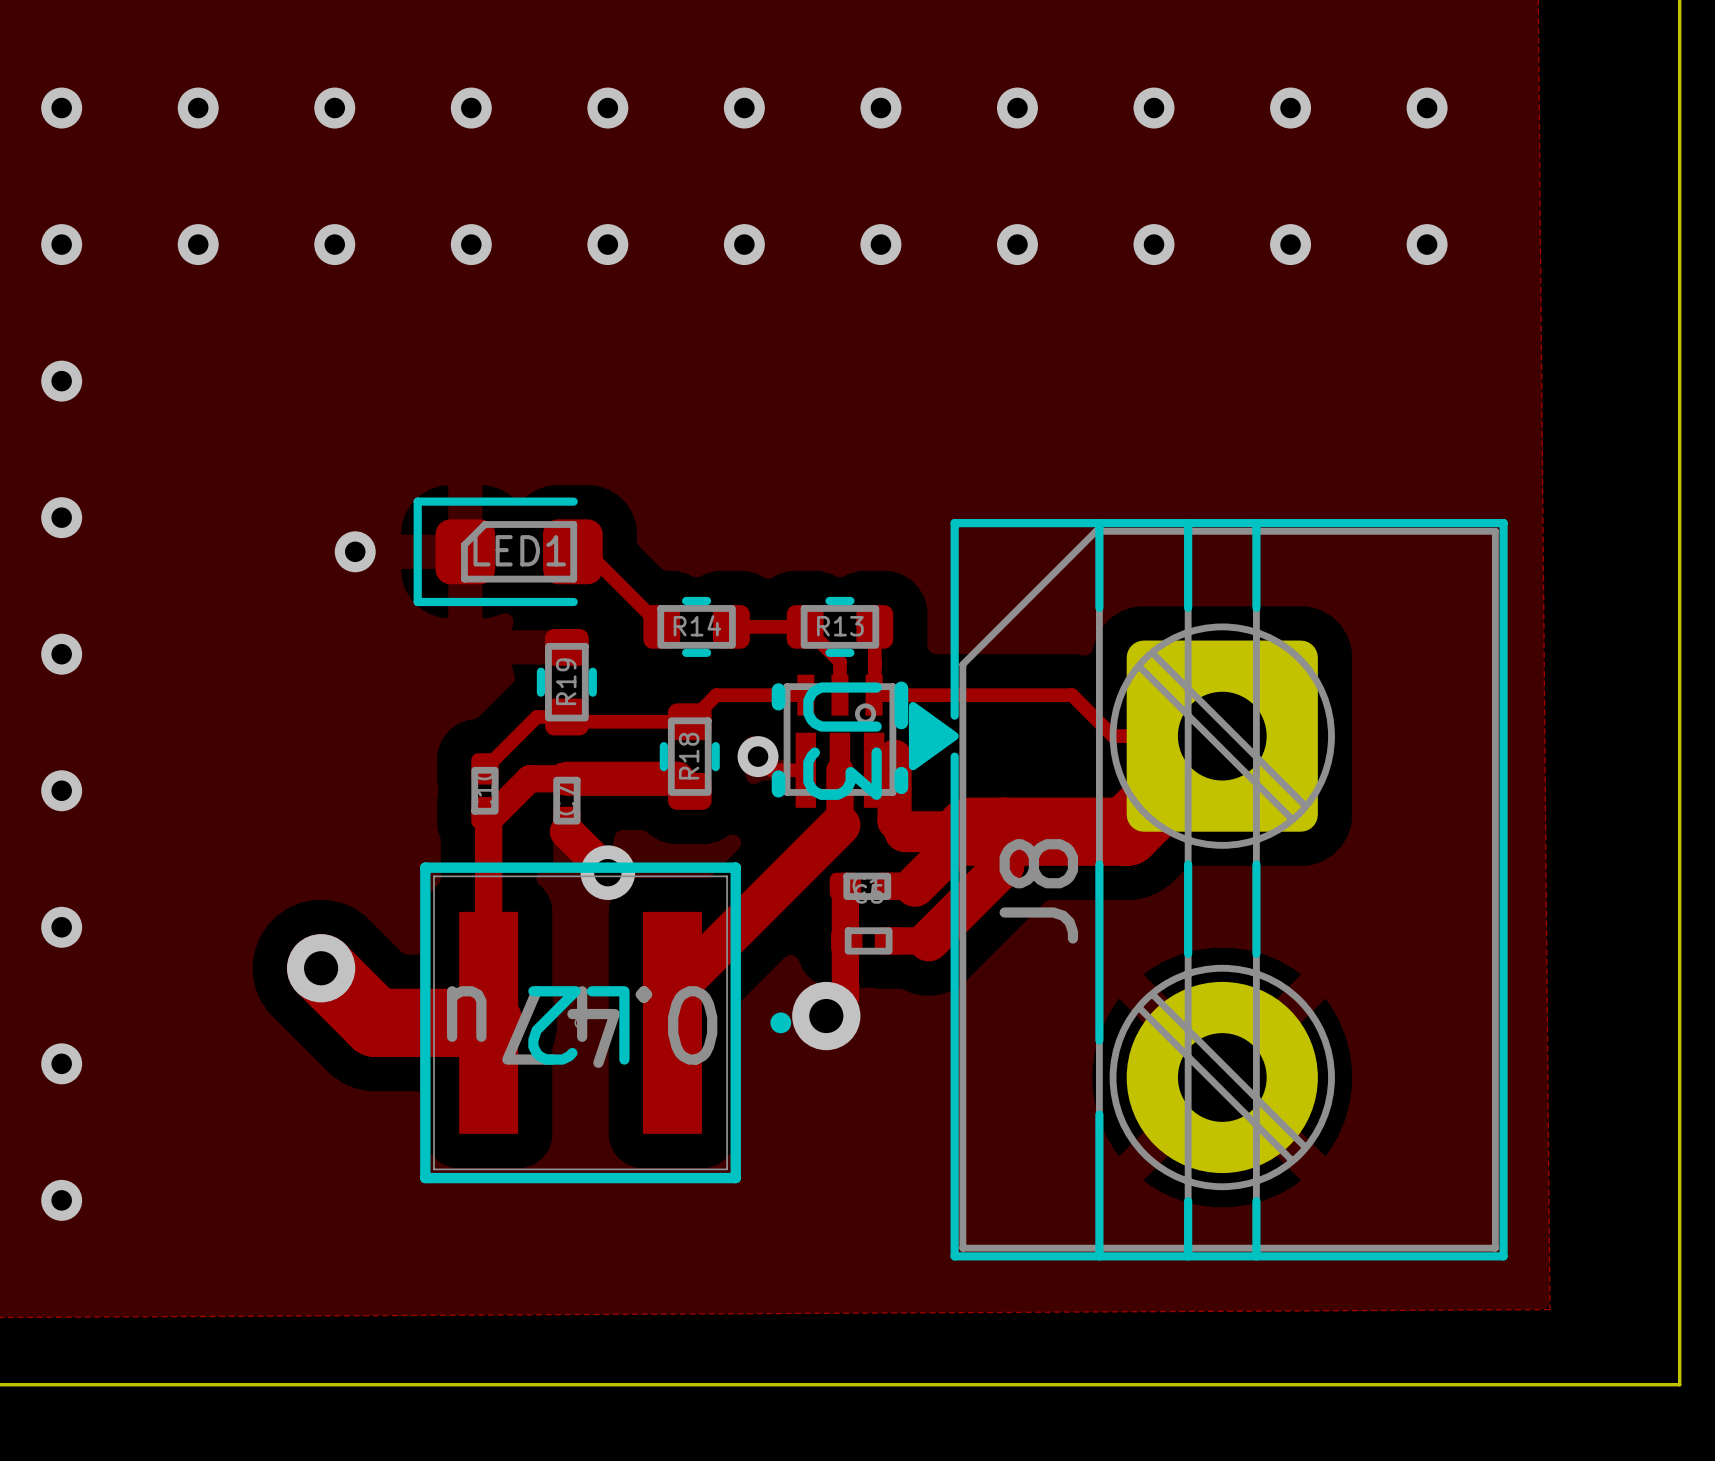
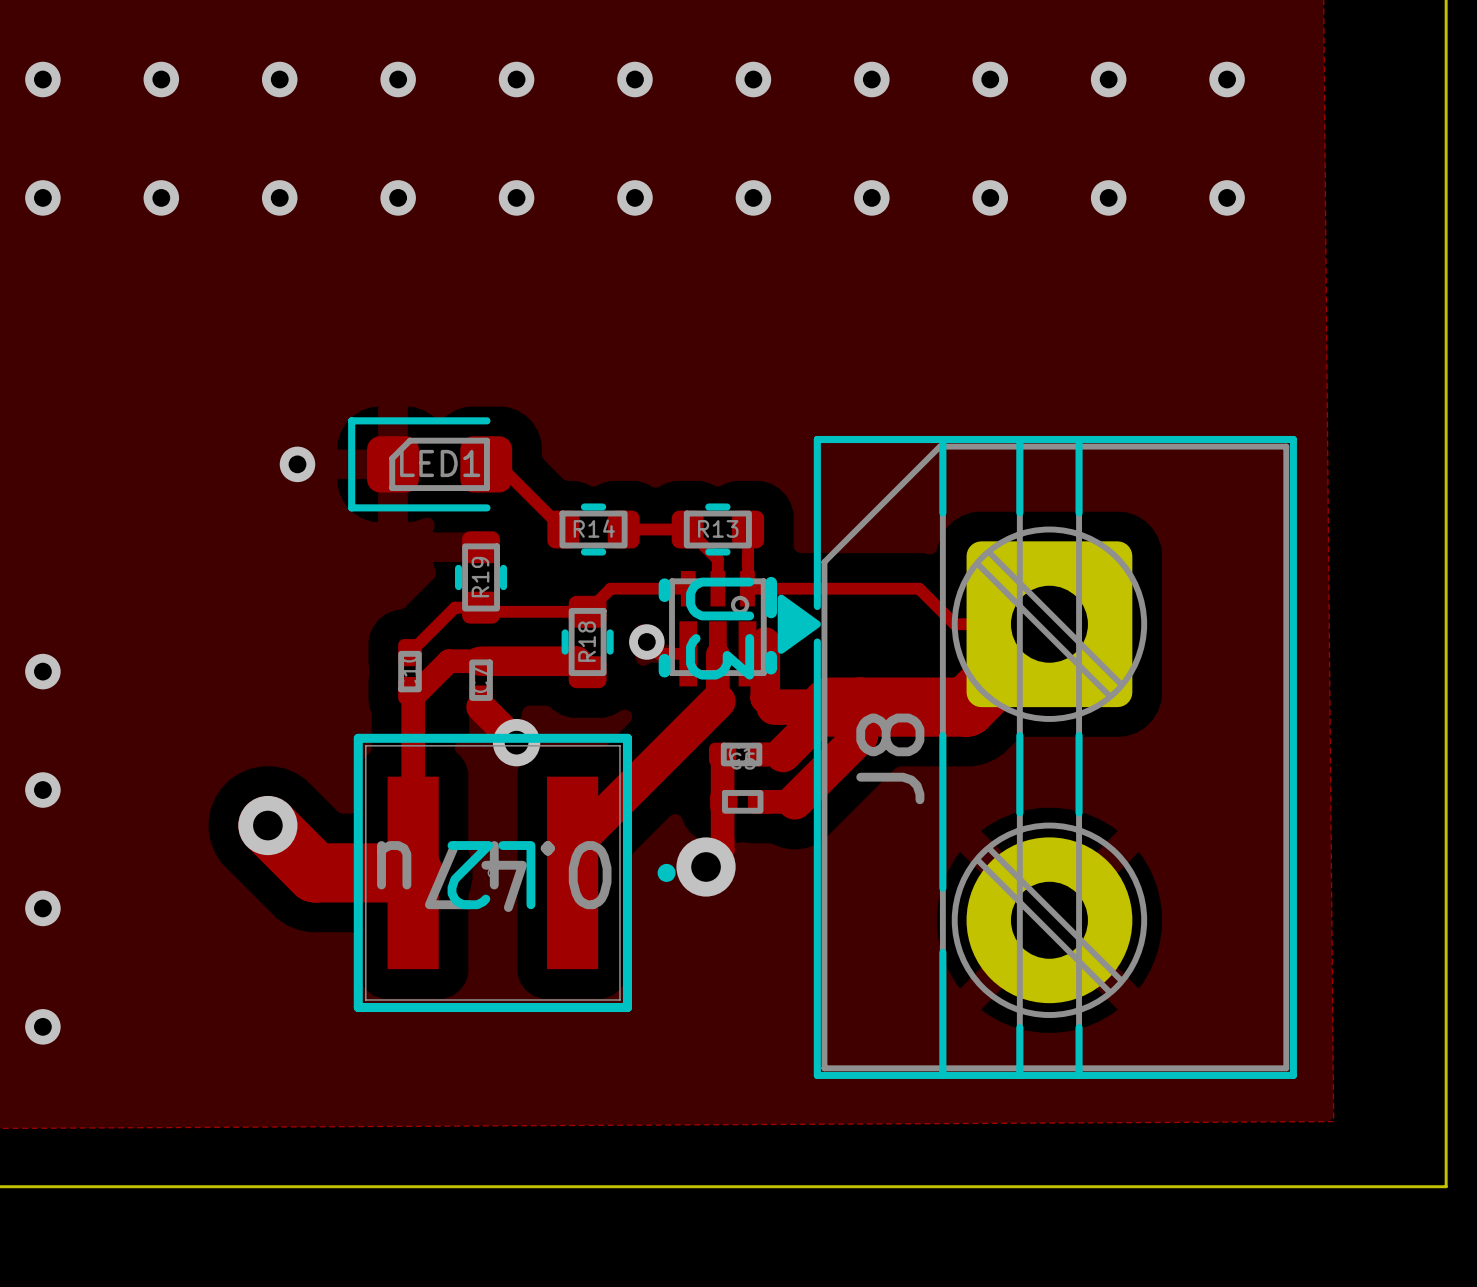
via: (61, 381) -> none
via: (61, 517) -> none
via: (61, 654) -> none

